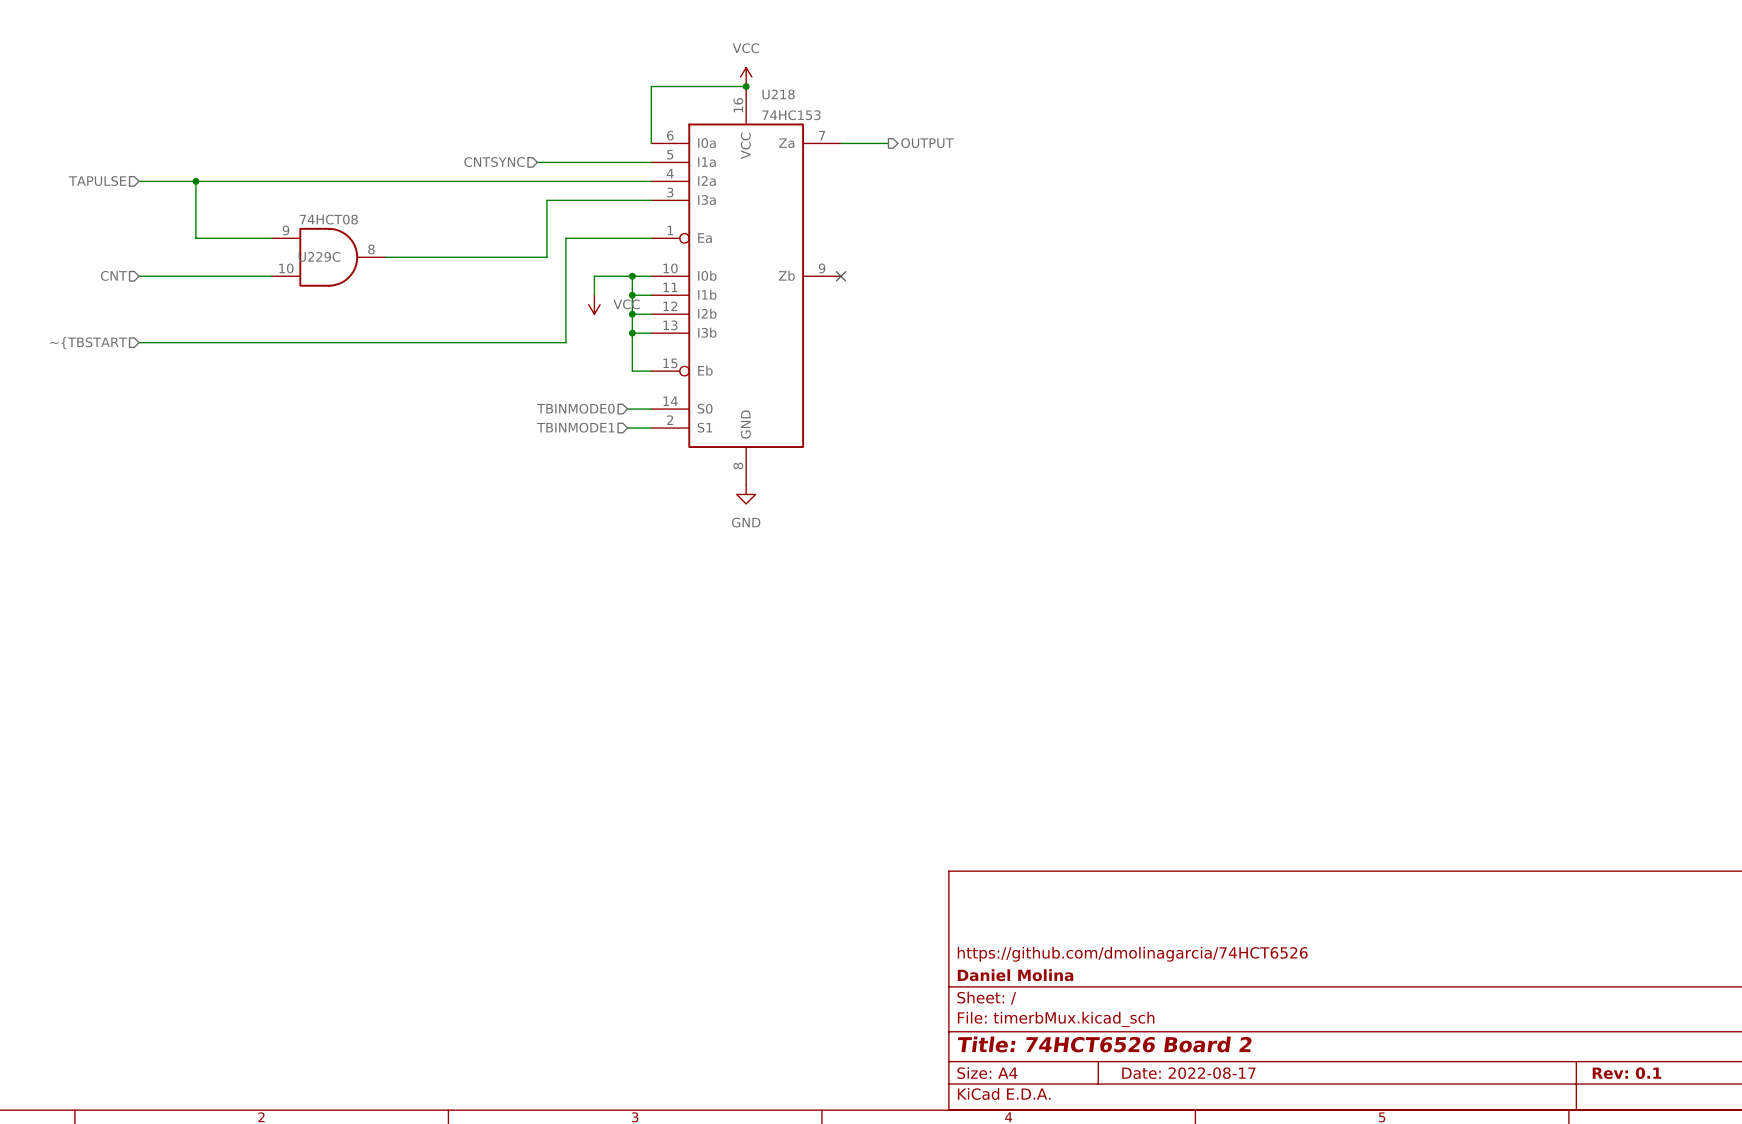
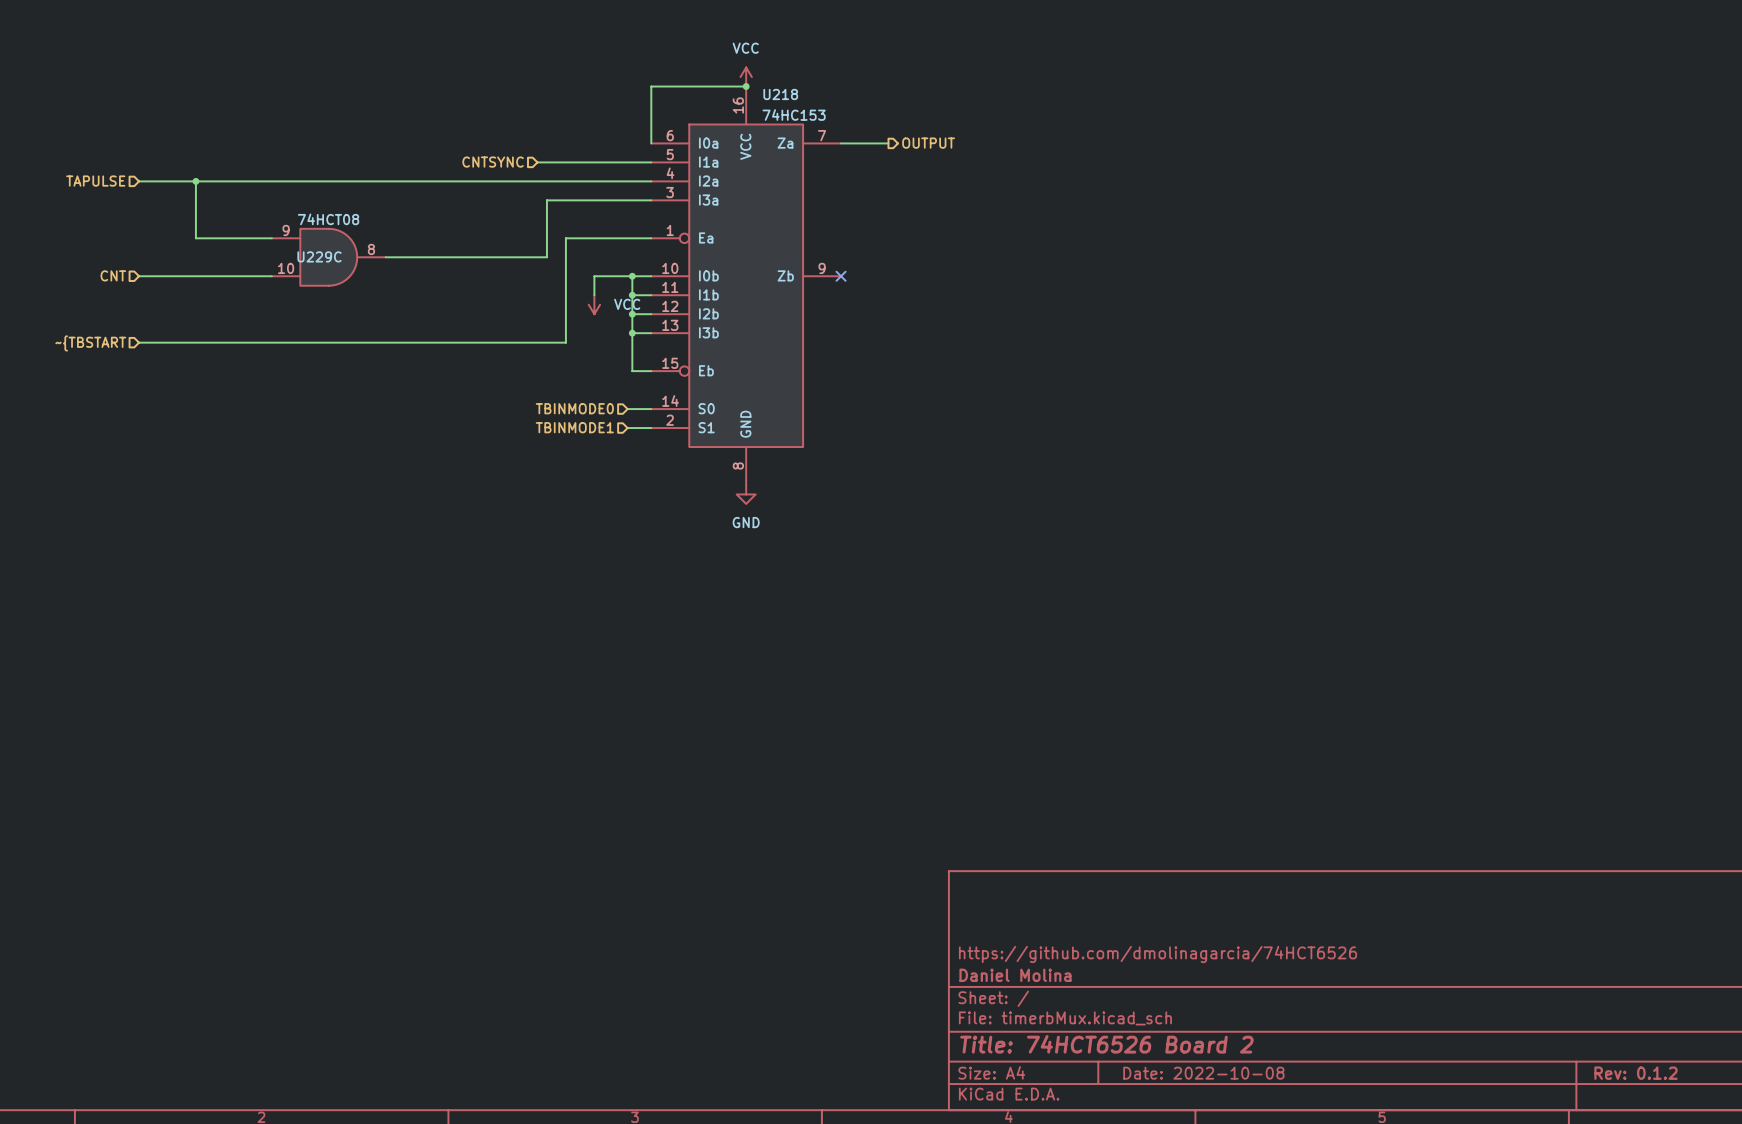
title block: Date: 2022-08-17 (1188, 1073) -> Date: 2022-10-08 (1203, 1073)
title block: Rev: 0.1 (1626, 1073) -> Rev: 0.1.2 (1636, 1073)

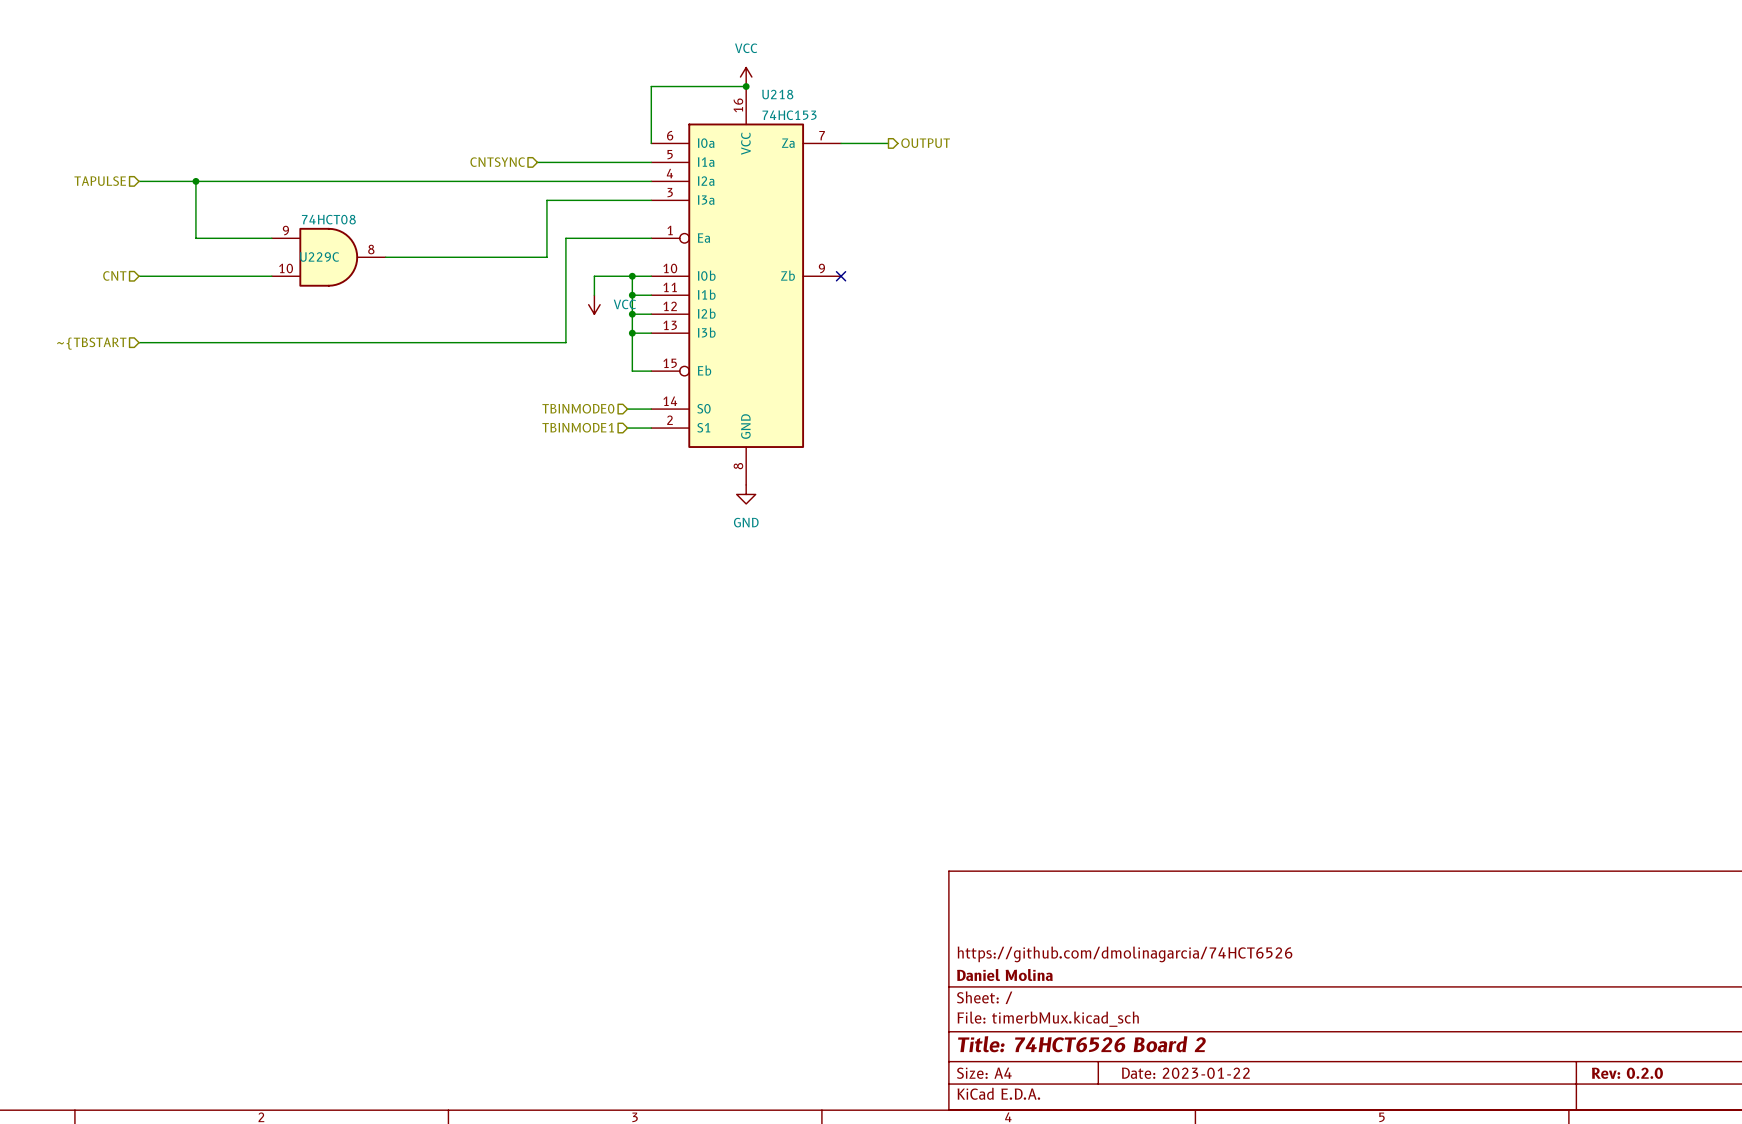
title block: Date: 2022-10-08 (1203, 1073) -> Date: 2023-01-22 (1185, 1073)
title block: Rev: 0.1.2 (1636, 1073) -> Rev: 0.2.0 (1627, 1073)

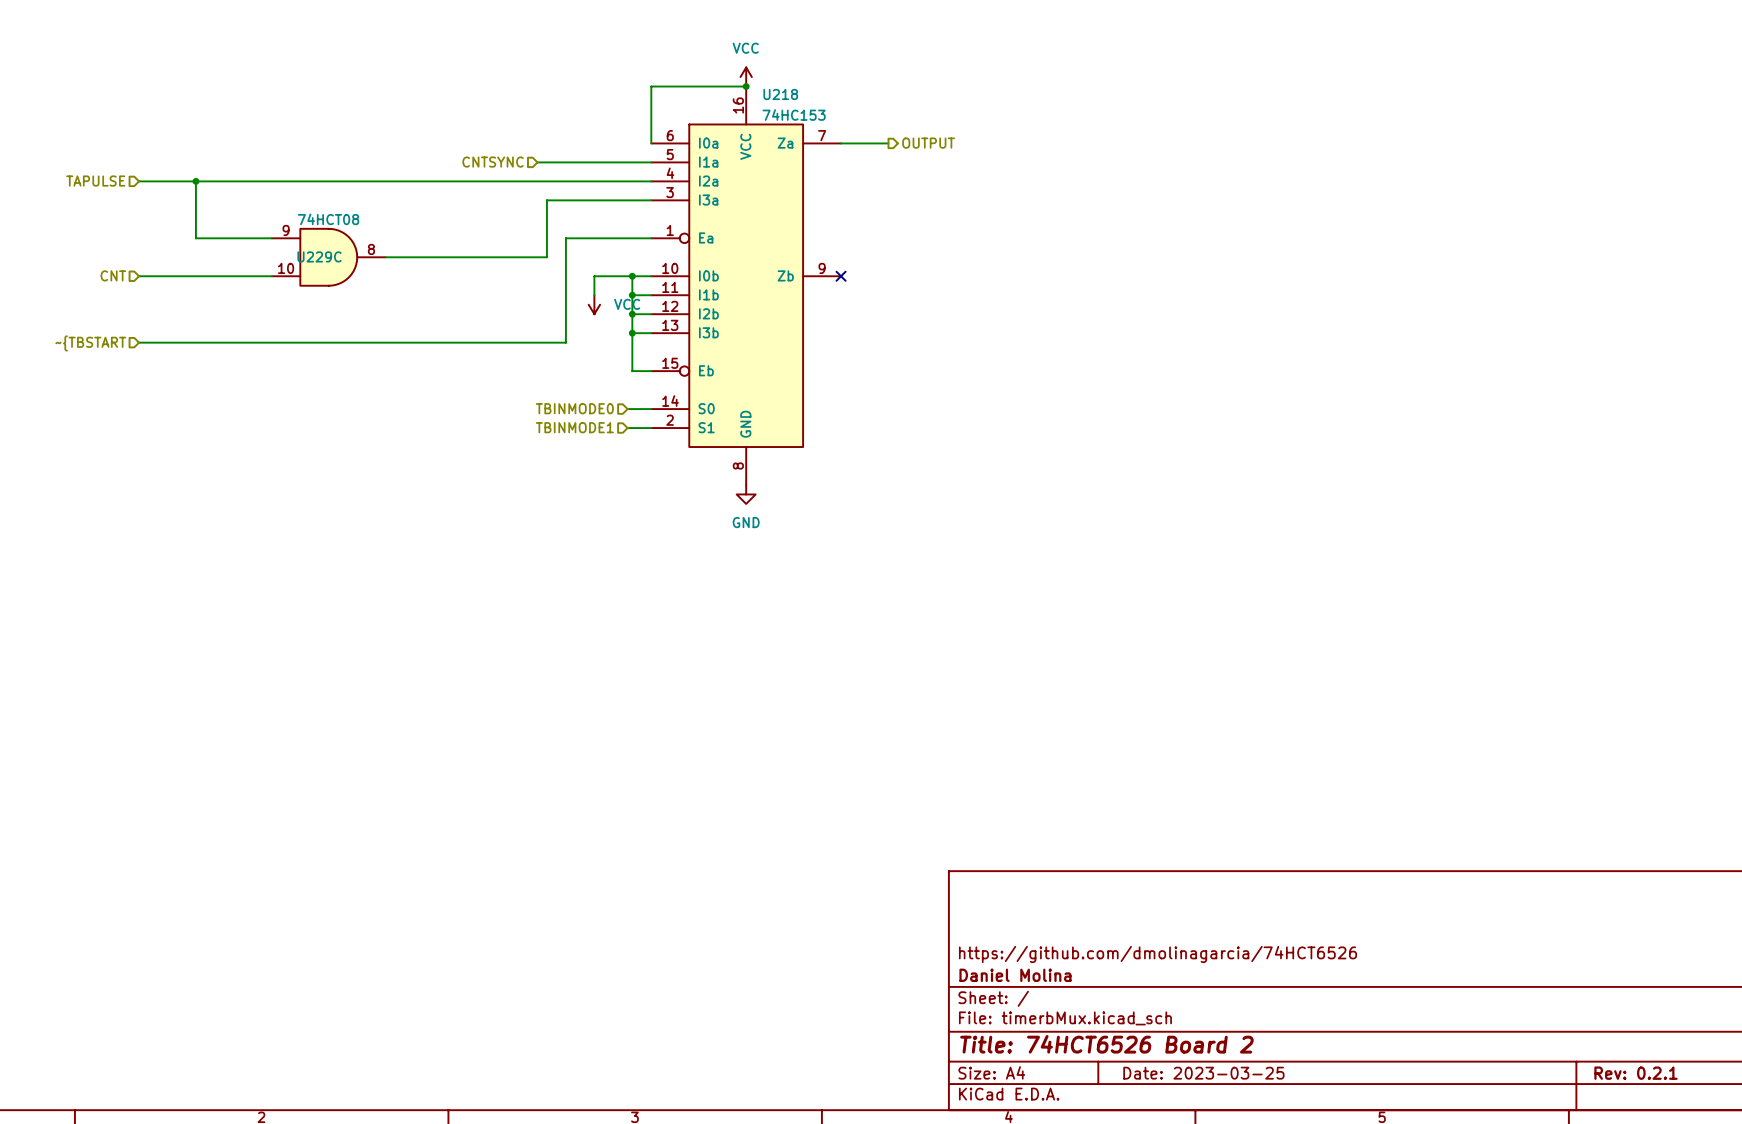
title block: Date: 2023-01-22 (1185, 1073) -> Date: 2023-03-25 (1203, 1073)
title block: Rev: 0.2.0 (1627, 1073) -> Rev: 0.2.1 (1636, 1073)

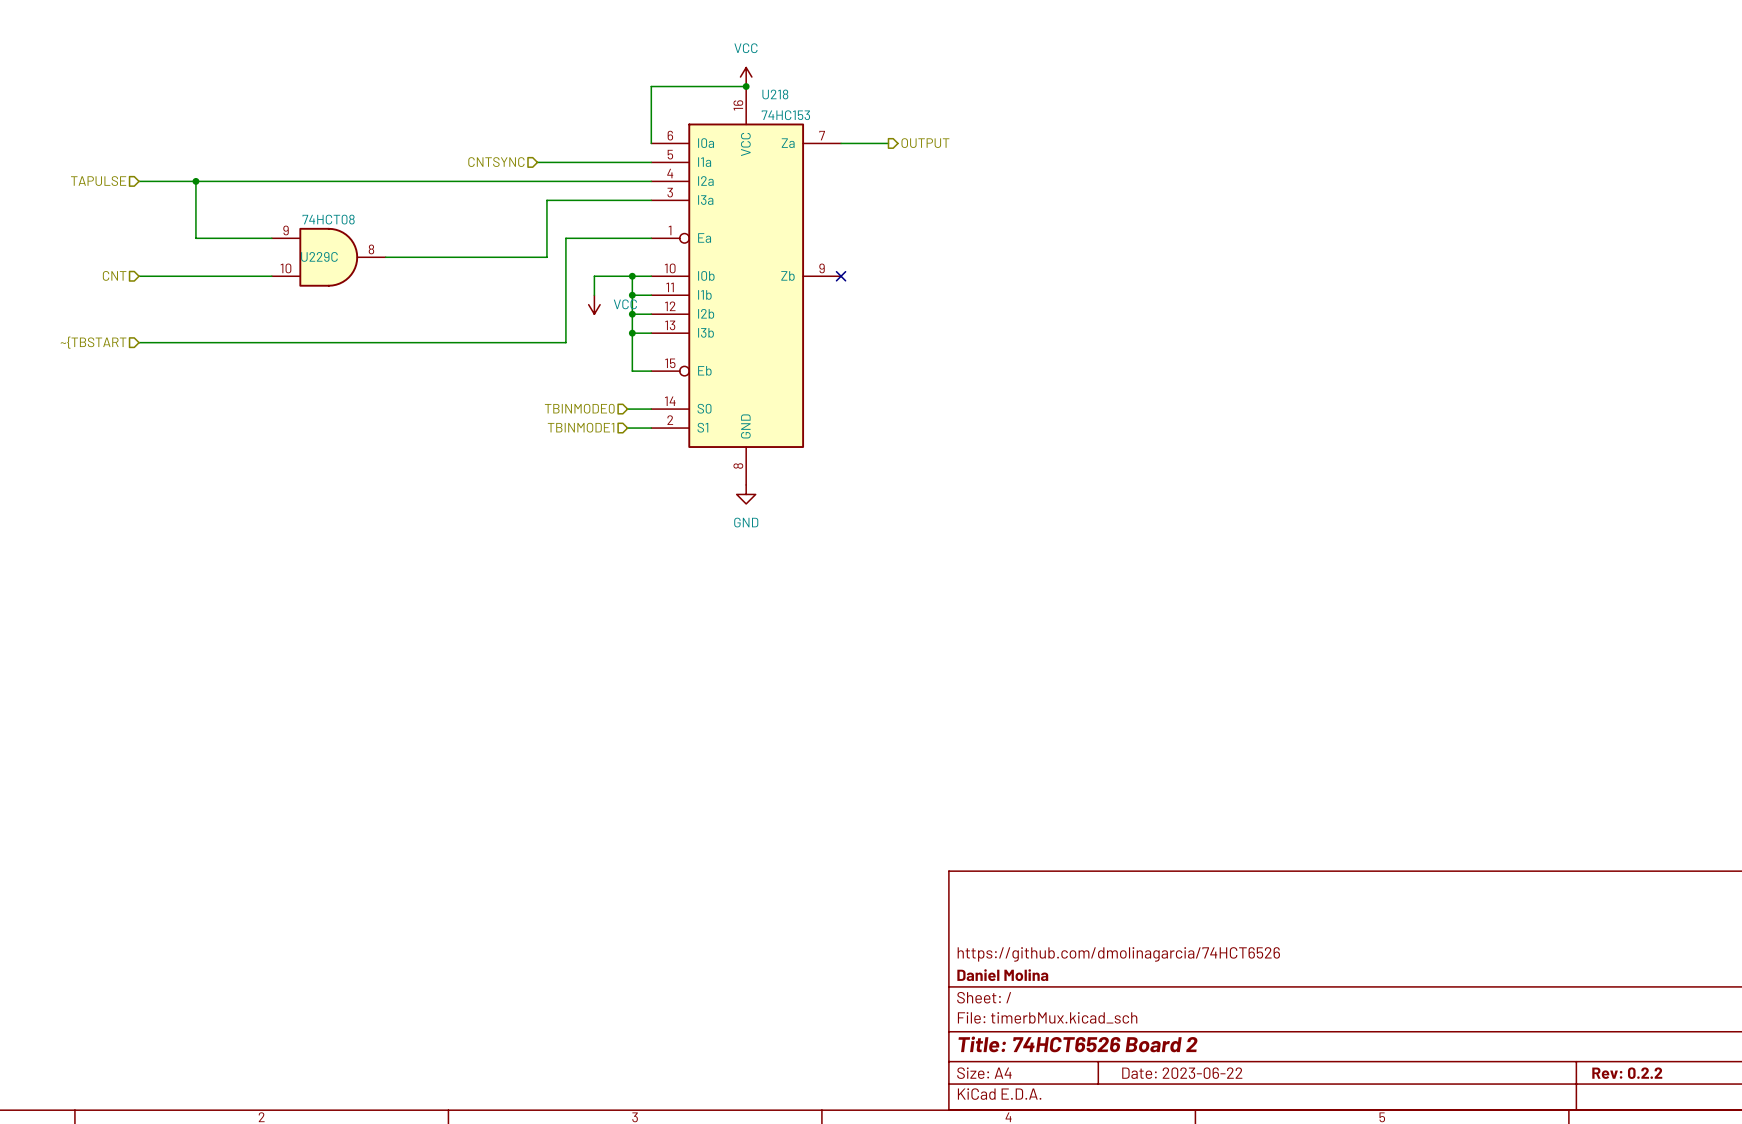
title block: Date: 2023-03-25 (1203, 1073) -> Date: 2023-06-22 (1182, 1073)
title block: Rev: 0.2.1 (1636, 1073) -> Rev: 0.2.2 (1627, 1073)

